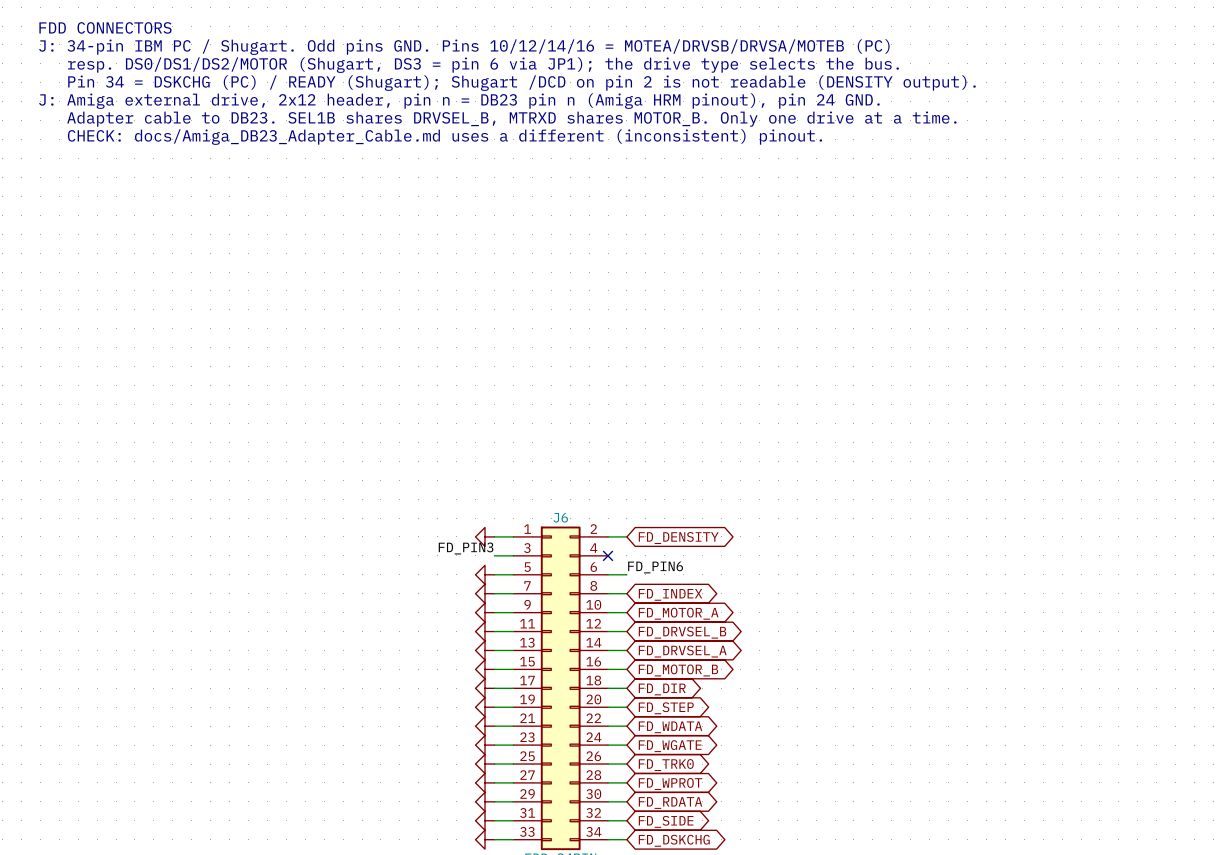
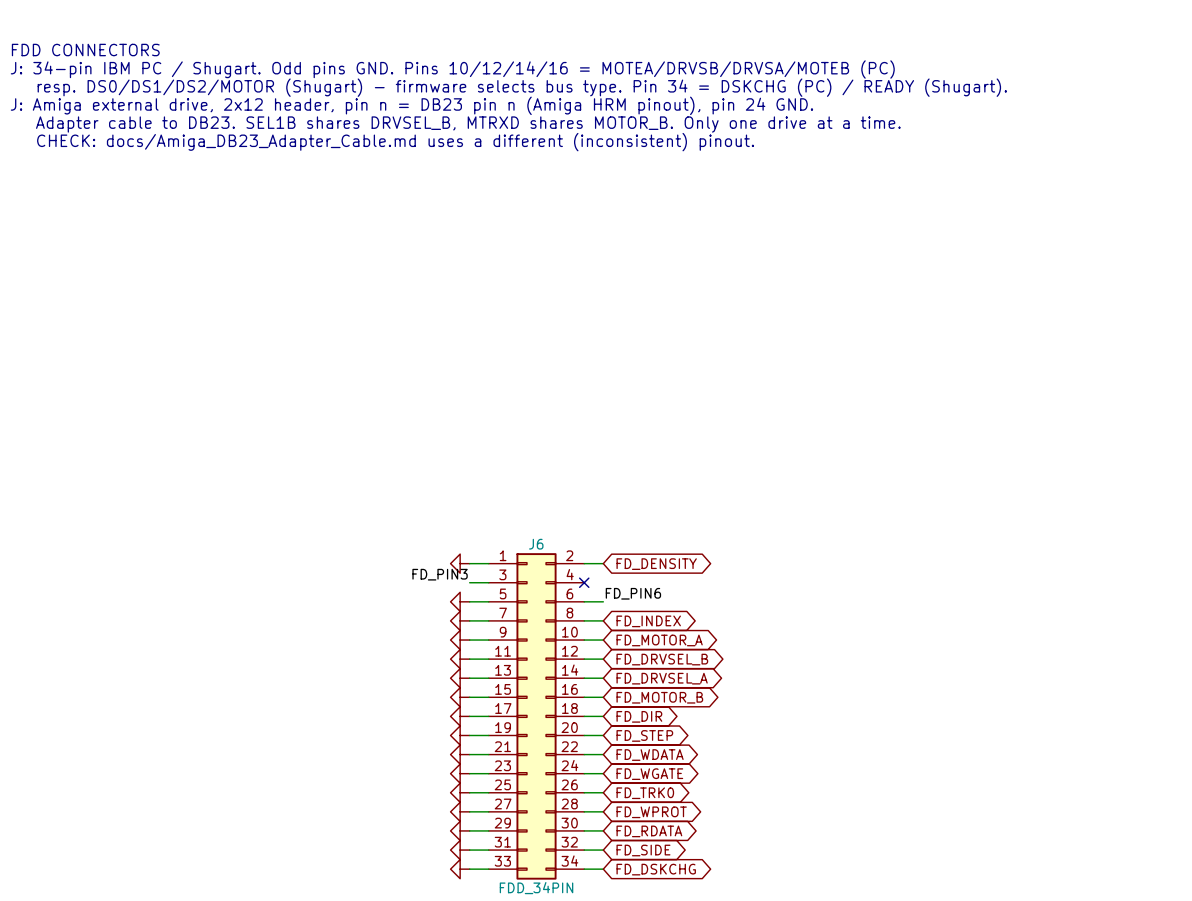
text: resp. DS0/DS1/DS2/MOTOR (Shugart, DS3 = pin 6 via JP1); the drive type selects the bus. (483, 65) -> resp. DS0/DS1/DS2/MOTOR (Shugart) - firmware selects bus type. Pin 34 = DSKCHG (PC) / READY (Shugart). (522, 87)
text: Pin 34 = DSKCHG (PC) / READY (Shugart); Shugart /DCD on pin 2 is not readable (DENSITY output). (521, 83) -> J: Amiga external drive, 2x12 header, pin n = DB23 pin n (Amiga HRM pinout), pin 24 GND. (411, 105)
text: J: Amiga external drive, 2x12 header, pin n = DB23 pin n (Amiga HRM pinout), pin 24 GND. (459, 101) -> Adapter cable to DB23. SEL1B shares DRVSEL_B, MTRXD shares MOTOR_B. Only one drive at a time. (468, 124)
text: Adapter cable to DB23. SEL1B shares DRVSEL_B, MTRXD shares MOTOR_B. Only one drive at a time. (511, 119) -> CHECK: docs/Amiga_DB23_Adapter_Cable.md uses a different (inconsistent) pinout. (395, 142)
text: CHECK: docs/Amiga_DB23_Adapter_Cable.md uses a different (inconsistent) pinout. (444, 137) -> none

